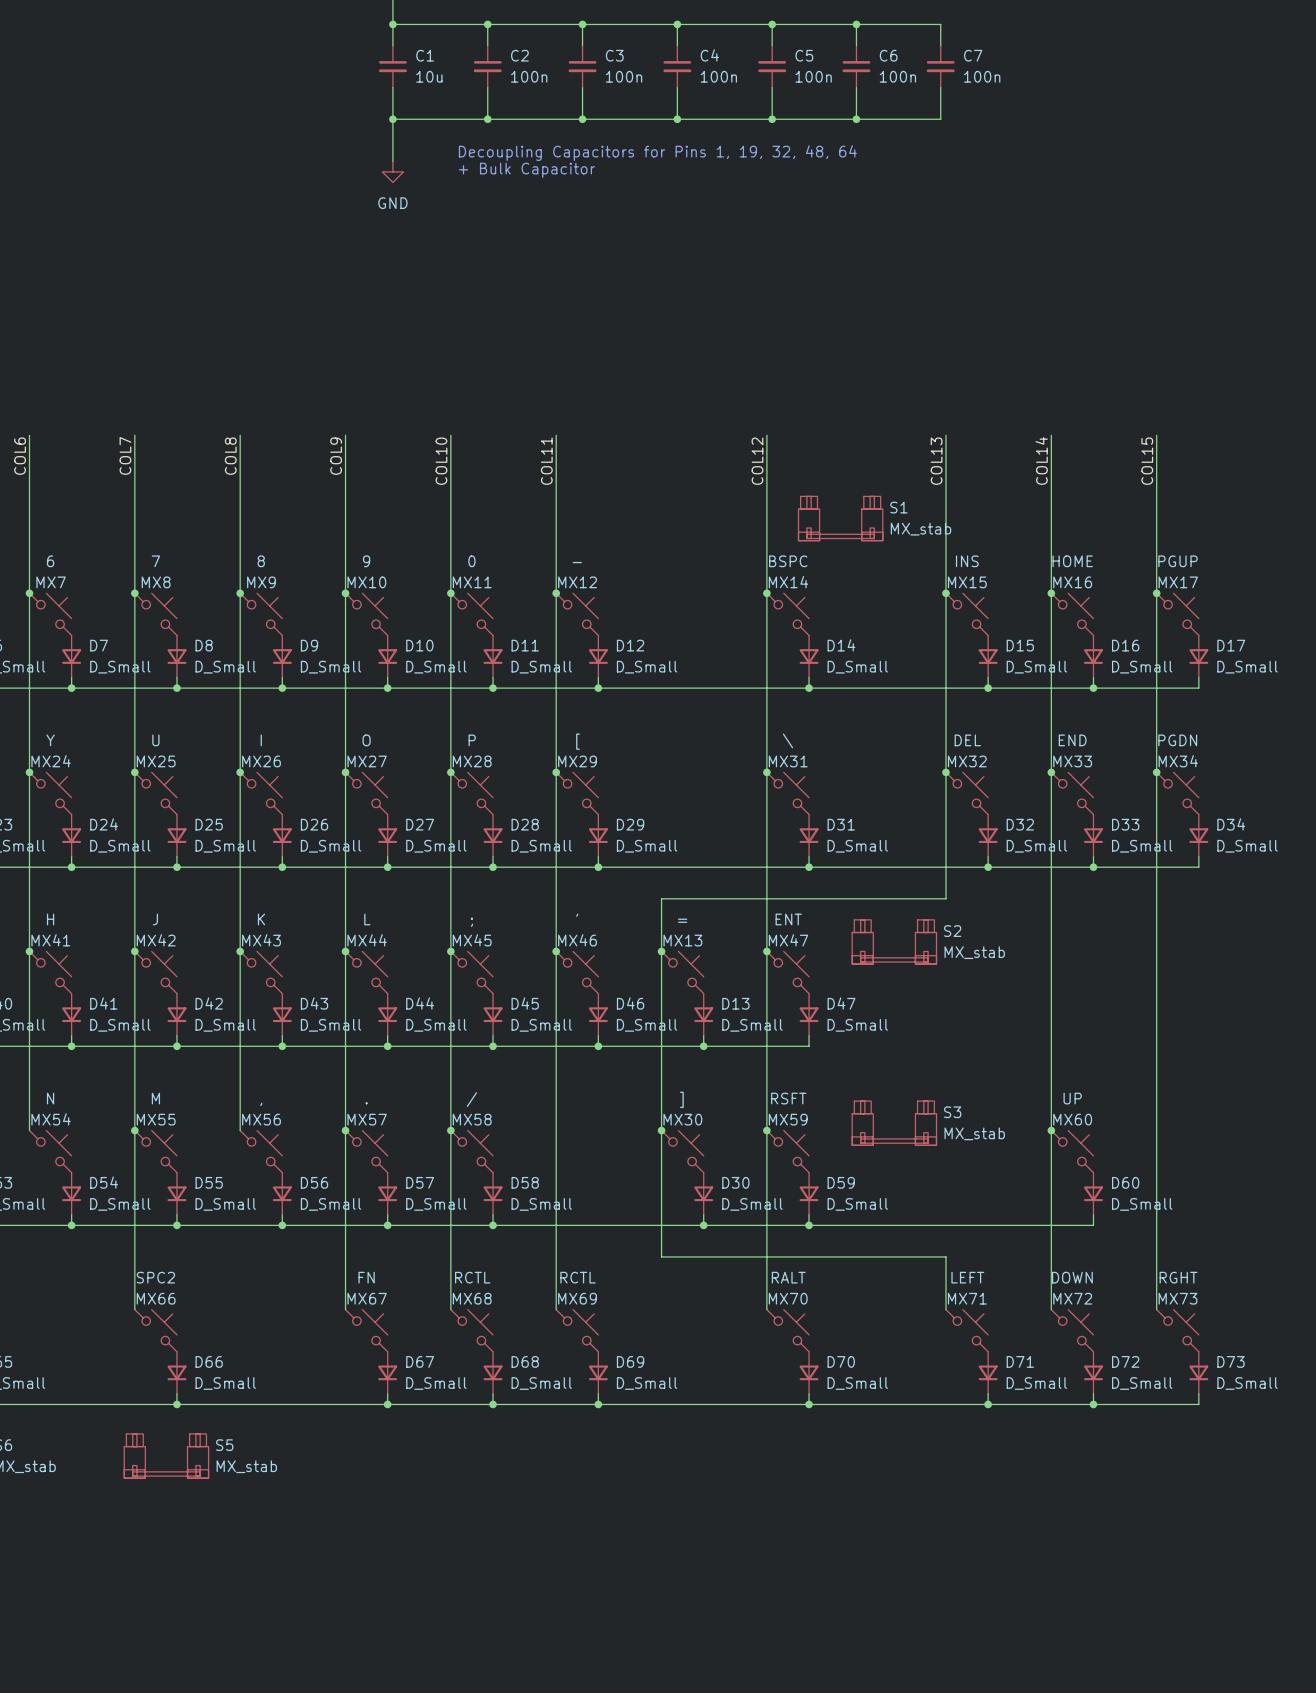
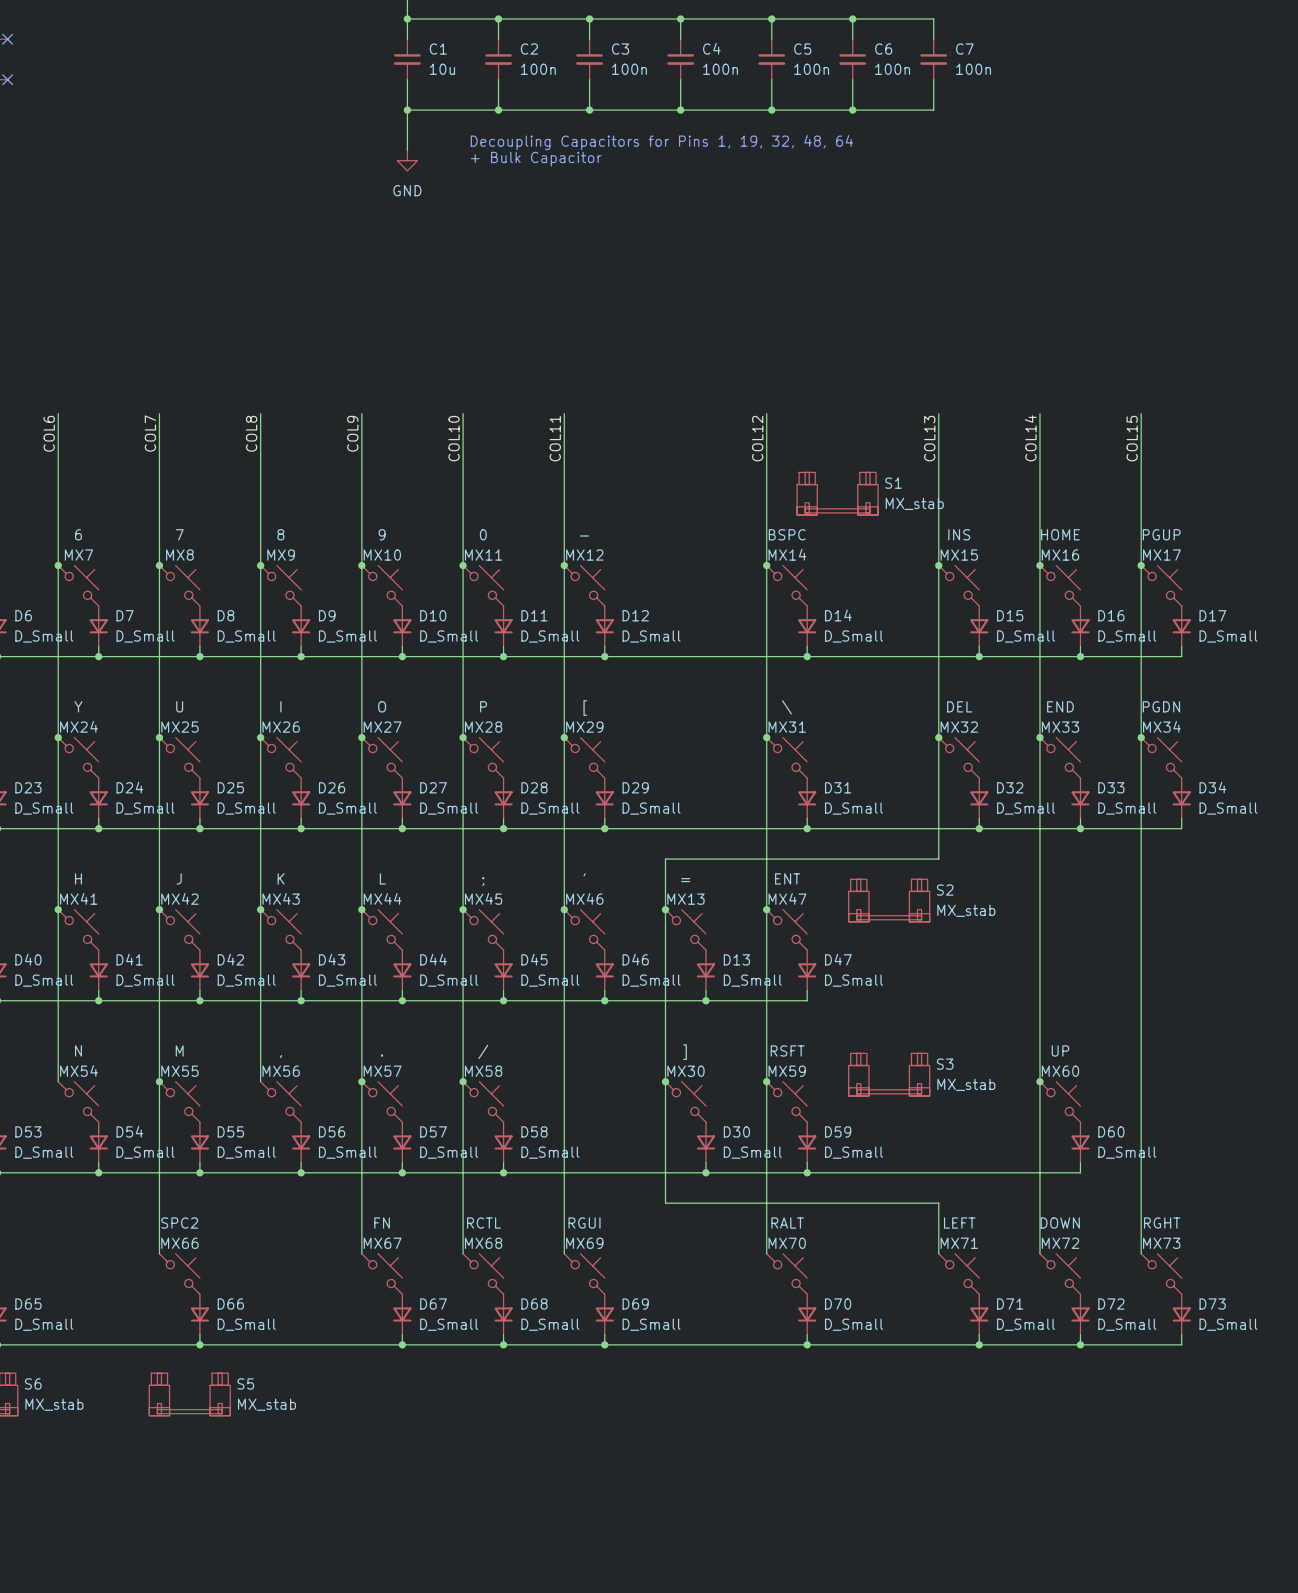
MX69 text: RCTL (578, 1277) -> RGUI (584, 1223)

